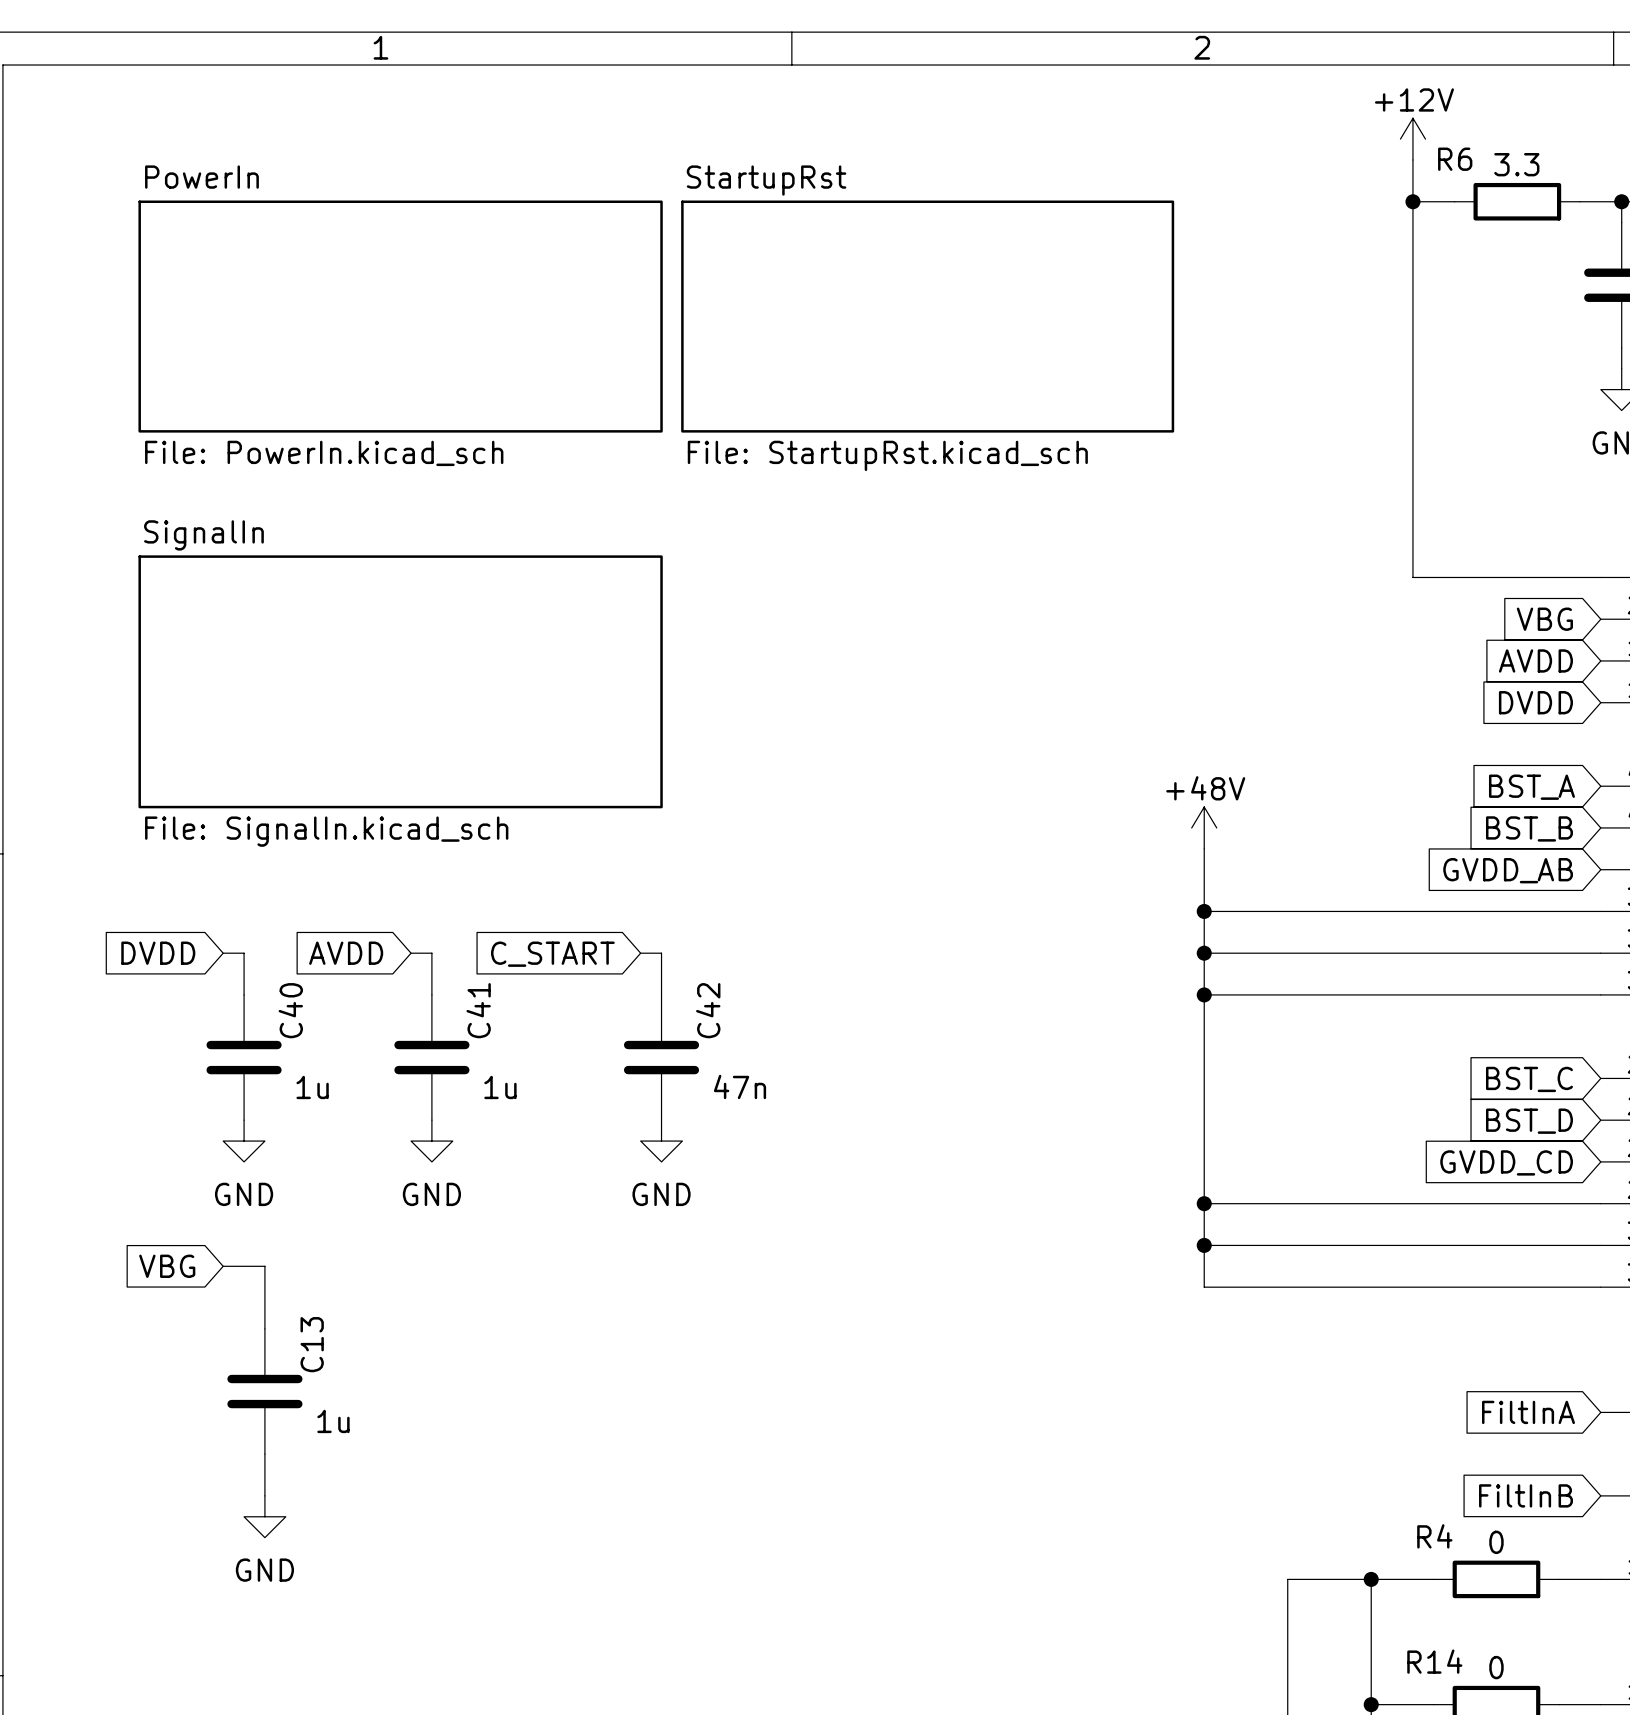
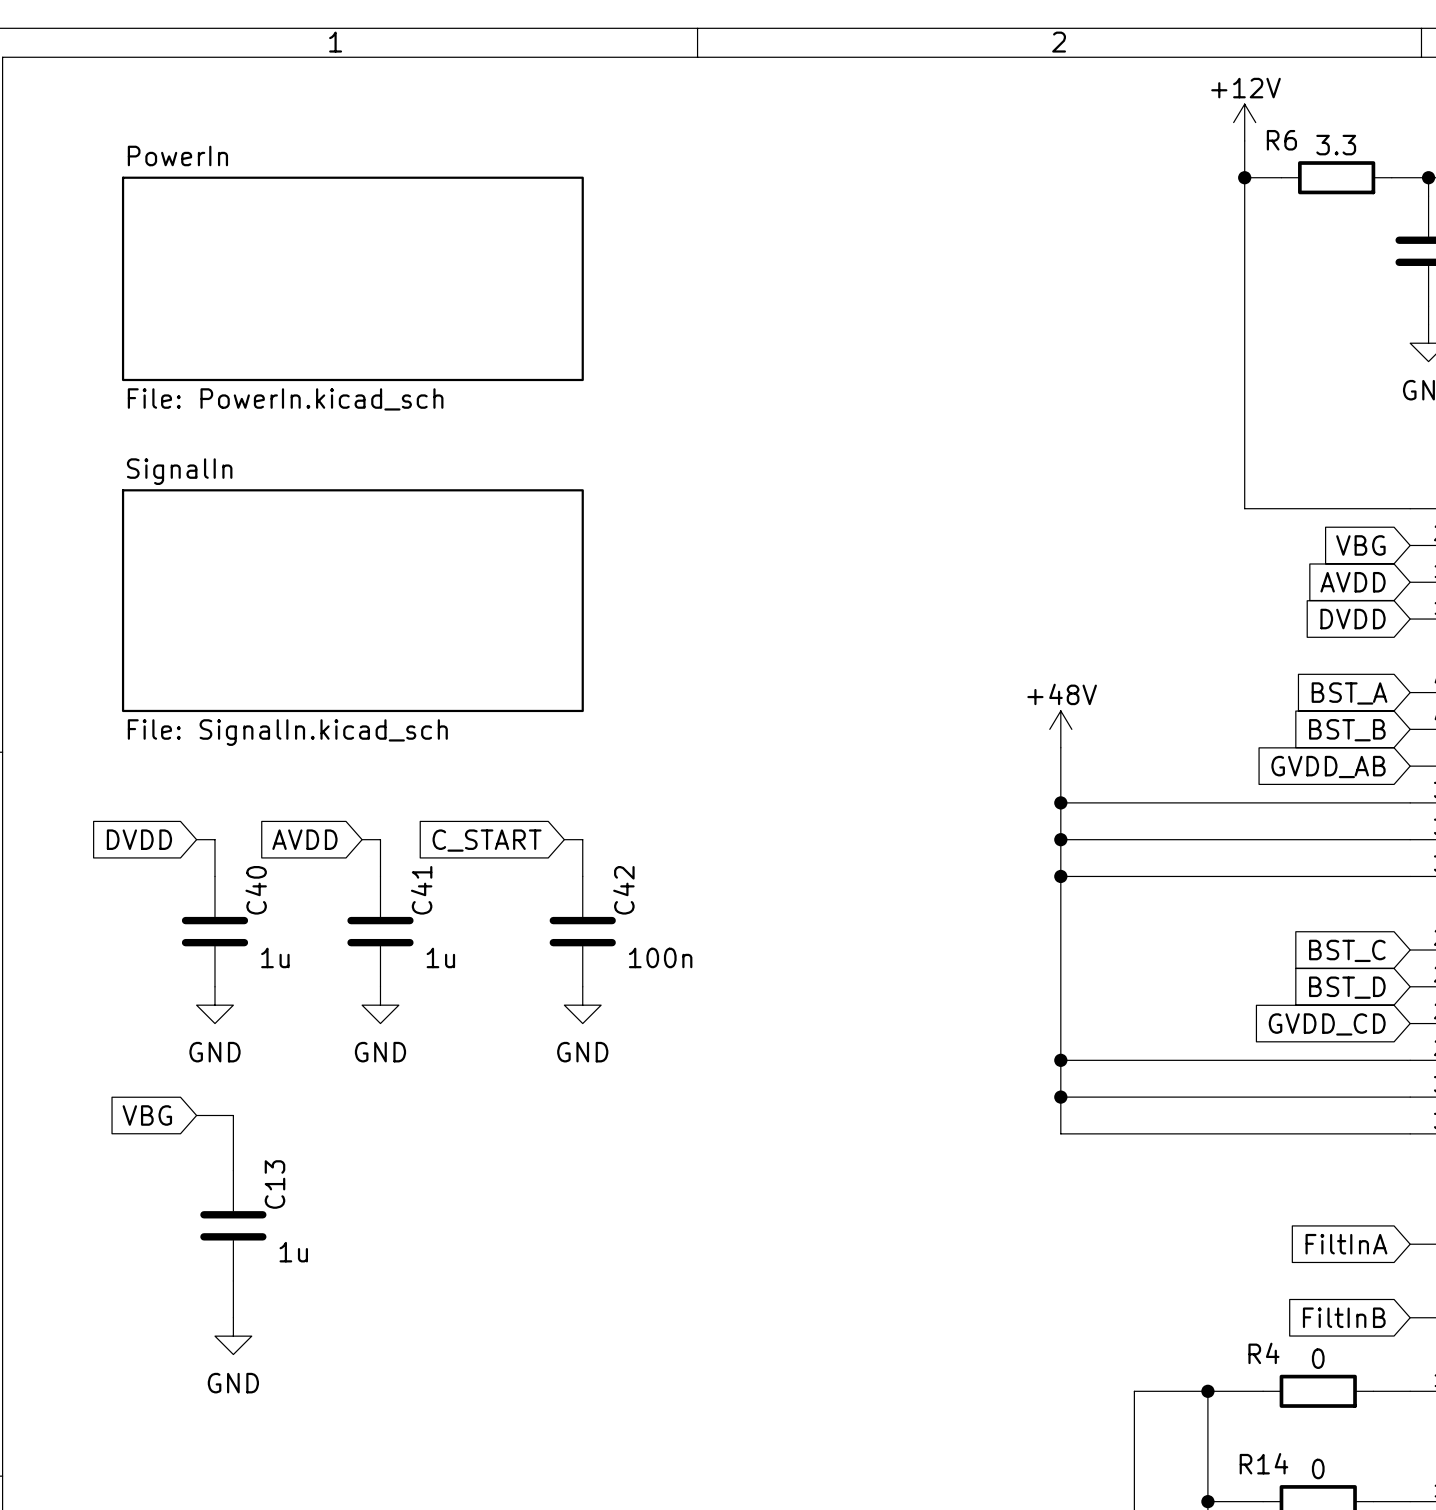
sheet StartupRst: File: StartupRst.kicad_sch (927, 316) -> none
C42 value: 47n (740, 1086) -> 100n (660, 957)

